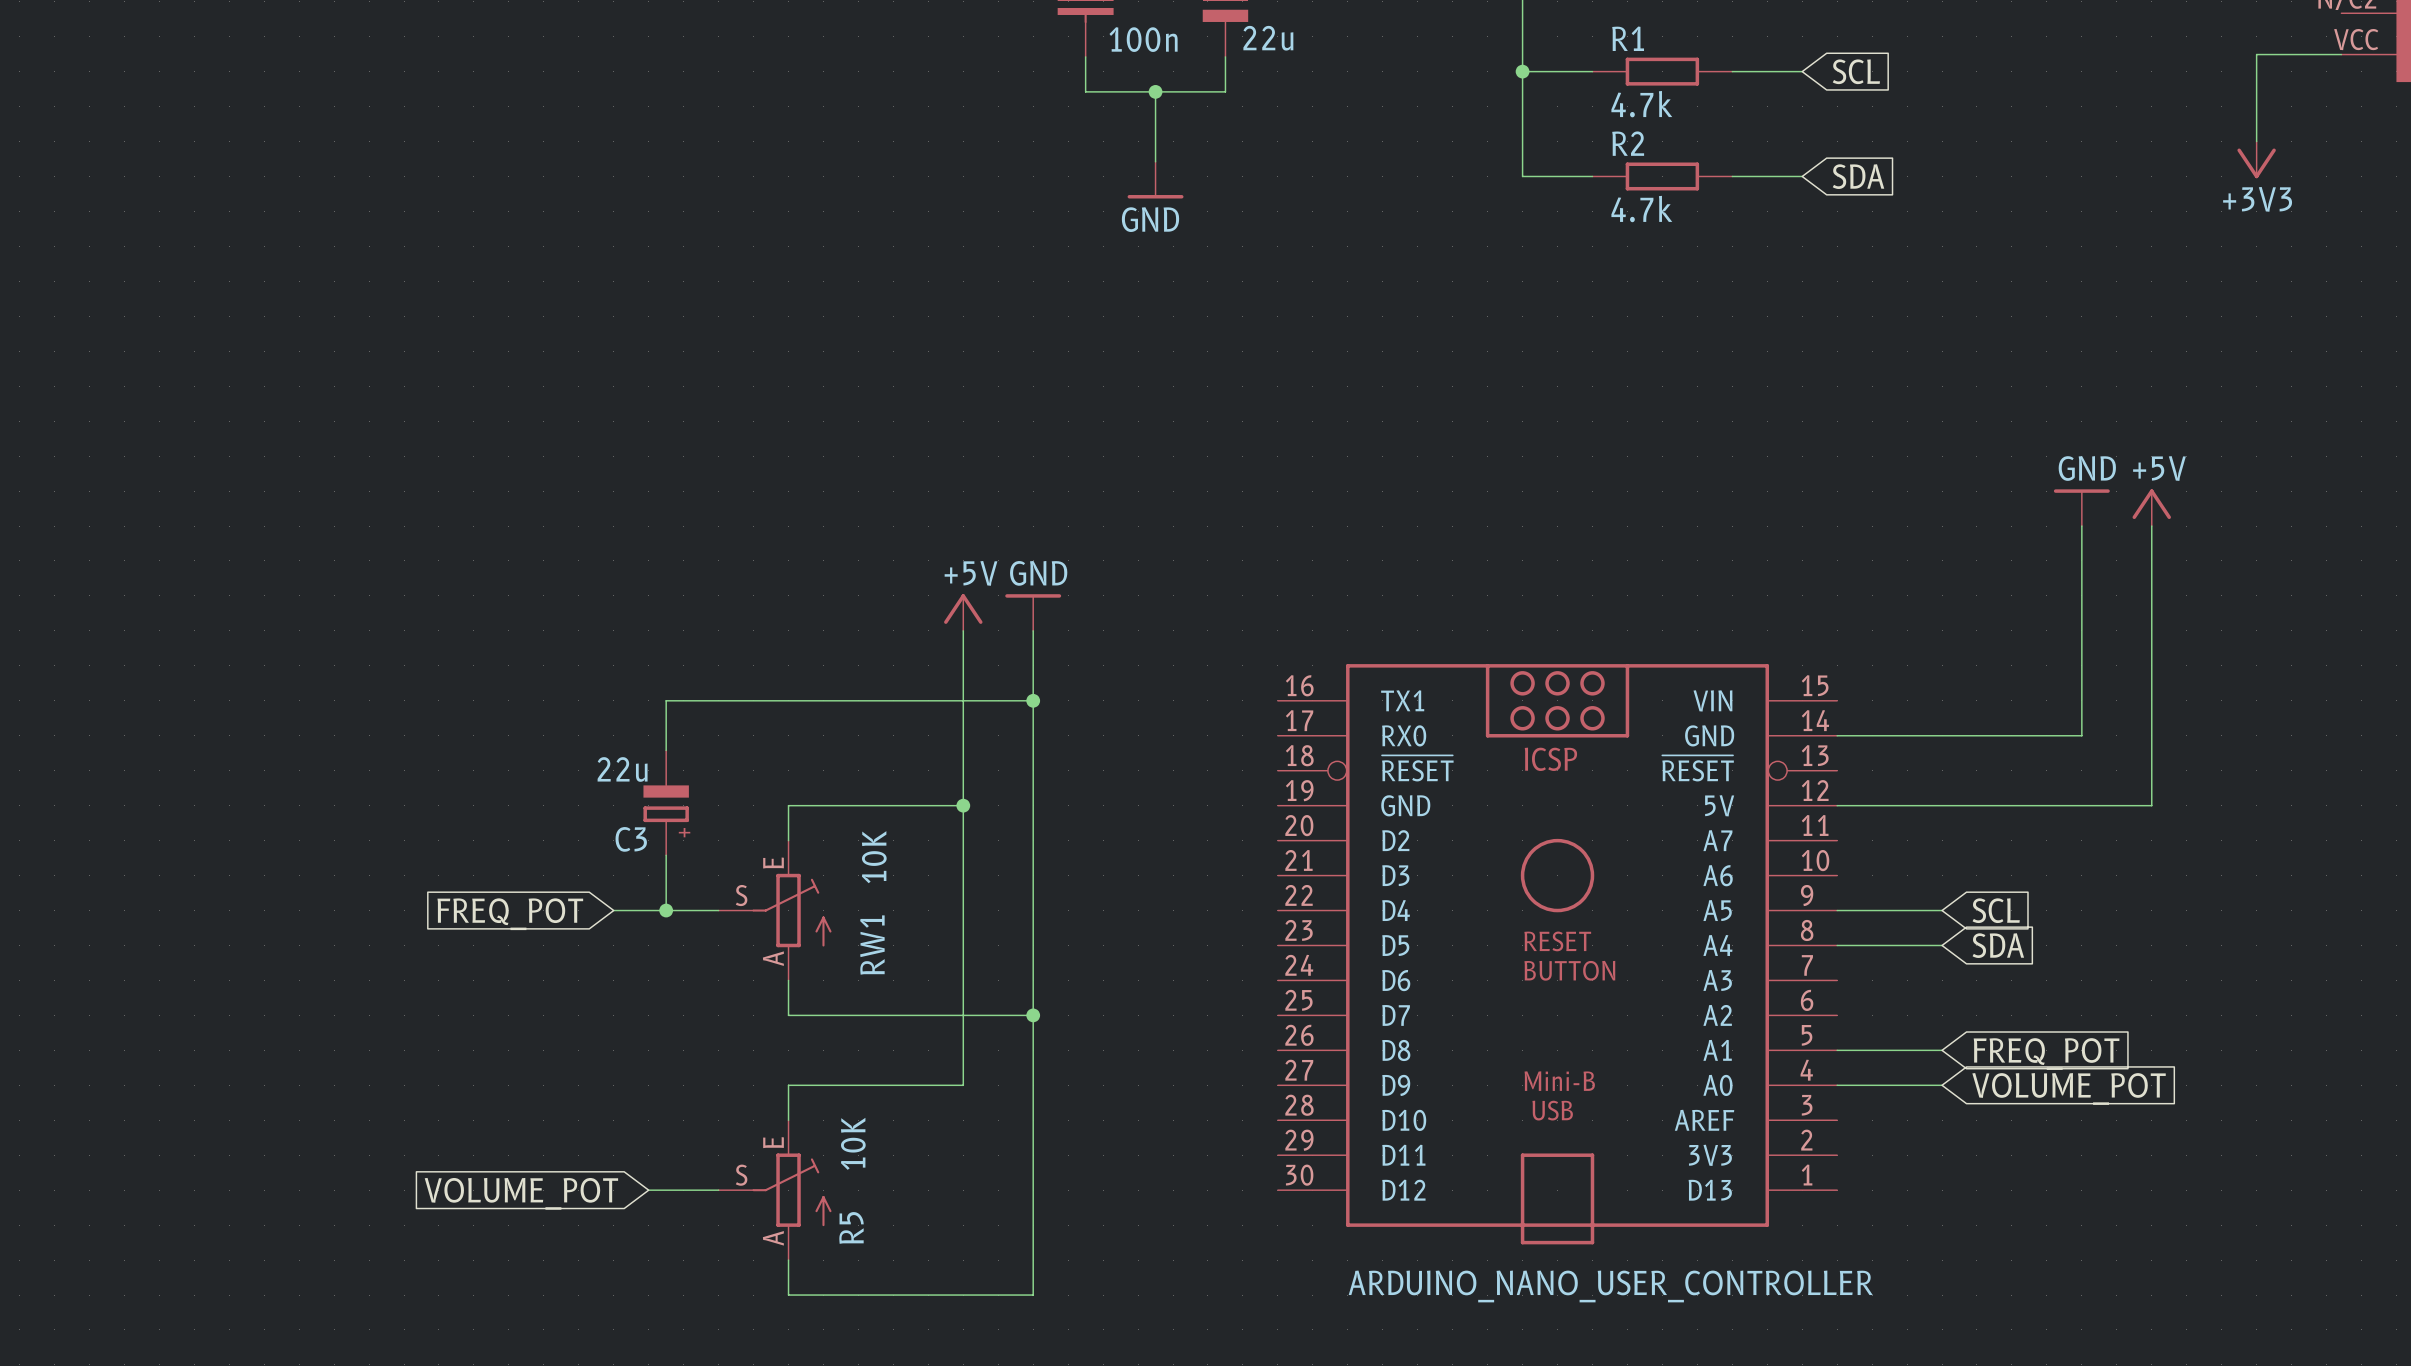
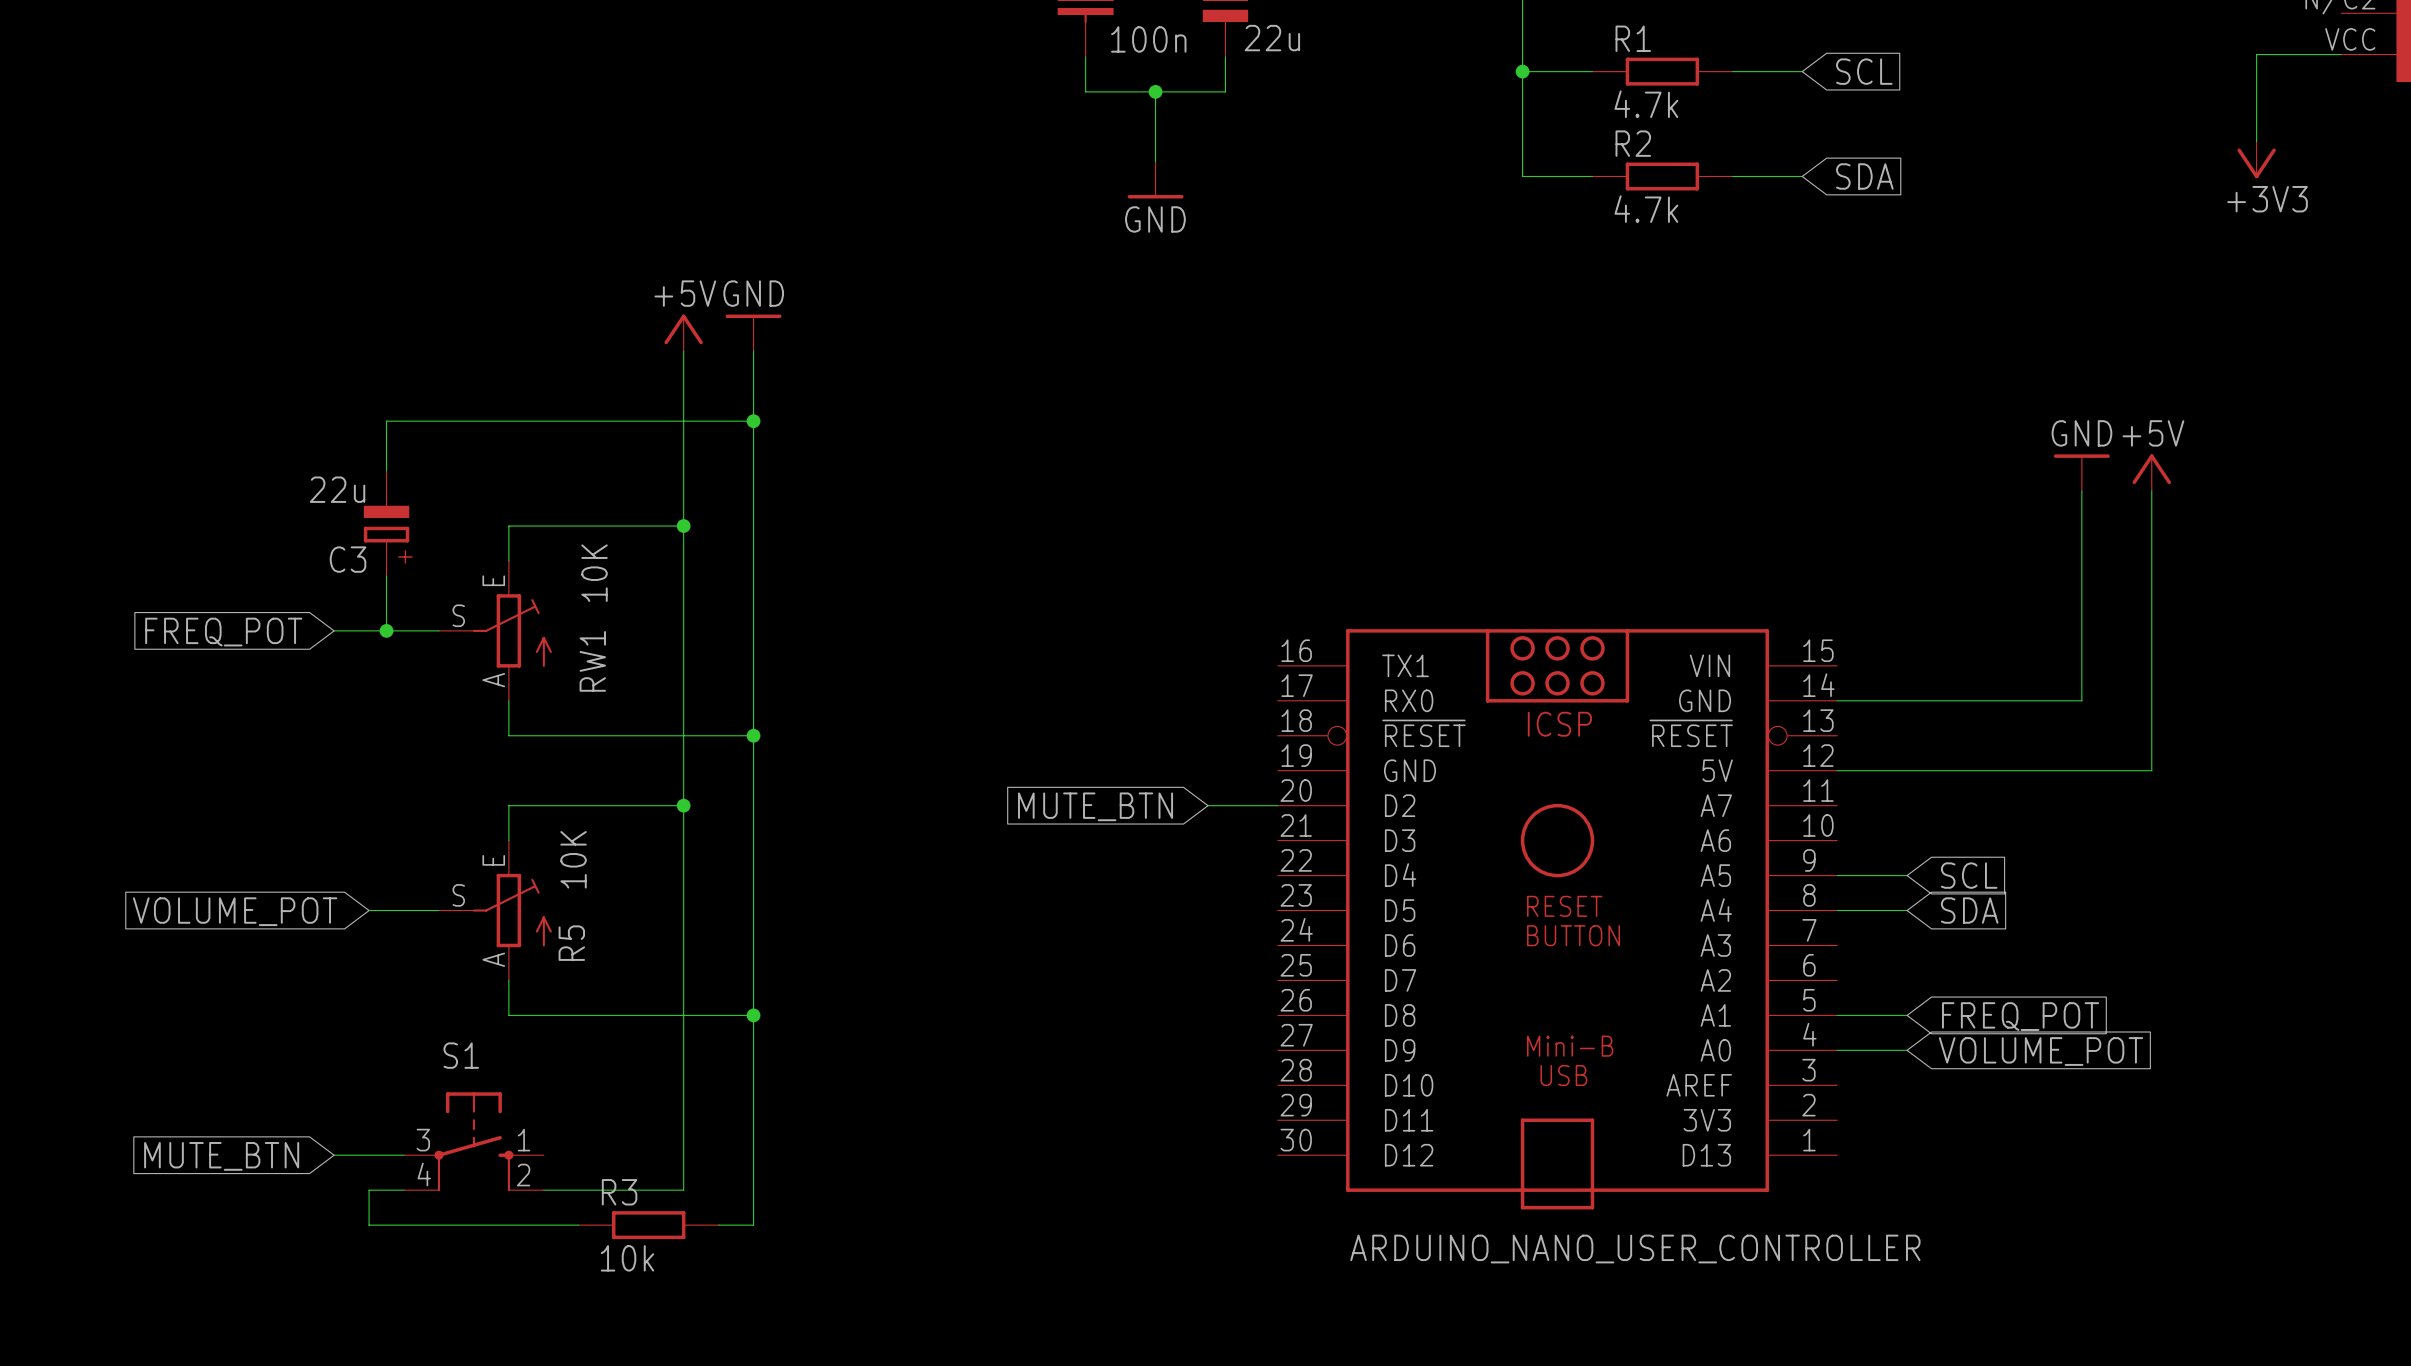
power symbol: none -> +5V (683, 332)
power symbol: none -> GND (753, 332)
wire: none -> (753, 351) (753, 1225) (718, 1225)
wire: none -> (753, 421) (386, 421) (386, 470)
junction: none -> (753, 421)
power symbol position: GND (2081, 507) -> GND (2081, 472)
power symbol position: +5V (2151, 507) -> +5V (2151, 472)
wire: none -> (683, 526) (508, 526) (508, 560)
junction: none -> (683, 526)
wire: none -> (386, 575) (386, 630)
power symbol: +5V (963, 612) -> none
power symbol: GND (1033, 612) -> none
wire: none -> (334, 630) (438, 630)
junction: none -> (386, 630)
wire: (963, 630) (963, 1085) (788, 1085) (788, 1120) -> none
wire: (1033, 630) (1033, 1295) (788, 1295) (788, 1260) -> none
global label: none -> FREQ_POT (223, 632)
wire: none -> (508, 700) (508, 735) (753, 735)
wire: (1033, 700) (666, 700) (666, 750) -> none
junction: (1033, 700) -> none
wire: (2081, 700) (2081, 735) (1837, 735) -> (2081, 700) (1837, 700)
junction: none -> (753, 735)
wire: (2151, 770) (2151, 805) (1837, 805) -> (2151, 770) (1837, 770)
C3 position: (666, 802) -> (386, 523)
junction: none -> (683, 805)
wire: (963, 805) (788, 805) (788, 840) -> (683, 805) (508, 805) (508, 840)
junction: (963, 805) -> none
wire: none -> (1207, 805) (1277, 805)
global label: none -> MUTE_BTN (1095, 806)
wire: (666, 855) (666, 910) -> none
wire: none -> (1837, 875) (1907, 875)
wire: none -> (369, 910) (438, 910)
wire: (613, 910) (718, 910) -> (543, 1190) (648, 1190)
junction: (666, 910) -> none
RW1 position: (775, 910) -> (495, 630)
wire: (1907, 910) (1942, 910) -> none
global label position: SCL (1996, 910) -> SCL (1969, 875)
global label: none -> VOLUME_POT (235, 911)
global label: FREQ_POT (510, 914) -> none
wire: (1837, 945) (1942, 945) -> none
global label position: SDA (1998, 945) -> SDA (1969, 910)
ARDUINO_NANO_USER_CONTROLLER position: (1557, 954) -> (1557, 919)
wire: (788, 980) (788, 1015) (1033, 1015) -> (508, 980) (508, 1015) (753, 1015)
junction: none -> (753, 1015)
junction: (1033, 1015) -> none
wire: none -> (1837, 1015) (1907, 1015)
wire: (1907, 1050) (1942, 1050) -> none
global label position: FREQ_POT (2046, 1054) -> FREQ_POT (2020, 1016)
wire: (1837, 1085) (1942, 1085) -> none
global label position: VOLUME_POT (2069, 1088) -> VOLUME_POT (2041, 1051)
S1: none -> (473, 1141)
wire: none -> (334, 1155) (404, 1155)
global label: none -> MUTE_BTN (221, 1156)
wire: none -> (404, 1190) (369, 1190) (369, 1225) (578, 1225)
wire: (683, 1190) (718, 1190) -> (683, 1190) (683, 351)
R5 position: (775, 1190) -> (495, 910)
global label: VOLUME_POT (521, 1193) -> none
R3: none -> 10k (648, 1225)

